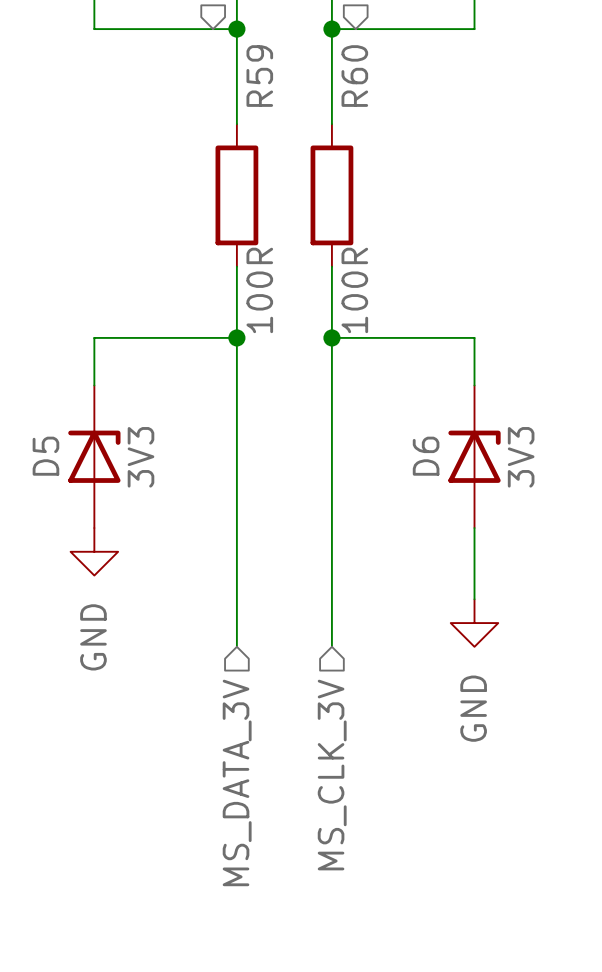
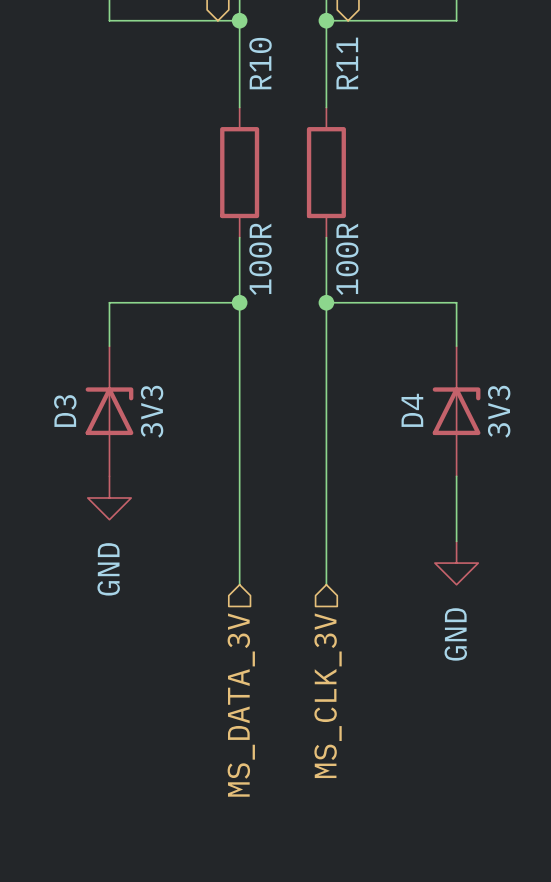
R59 name: R59 (259, 76) -> R10 (260, 63)
R60 name: R60 (354, 76) -> R11 (347, 63)
D5 name: D5 (45, 456) -> D3 (65, 411)
D6 name: D6 (426, 456) -> D4 (412, 410)

